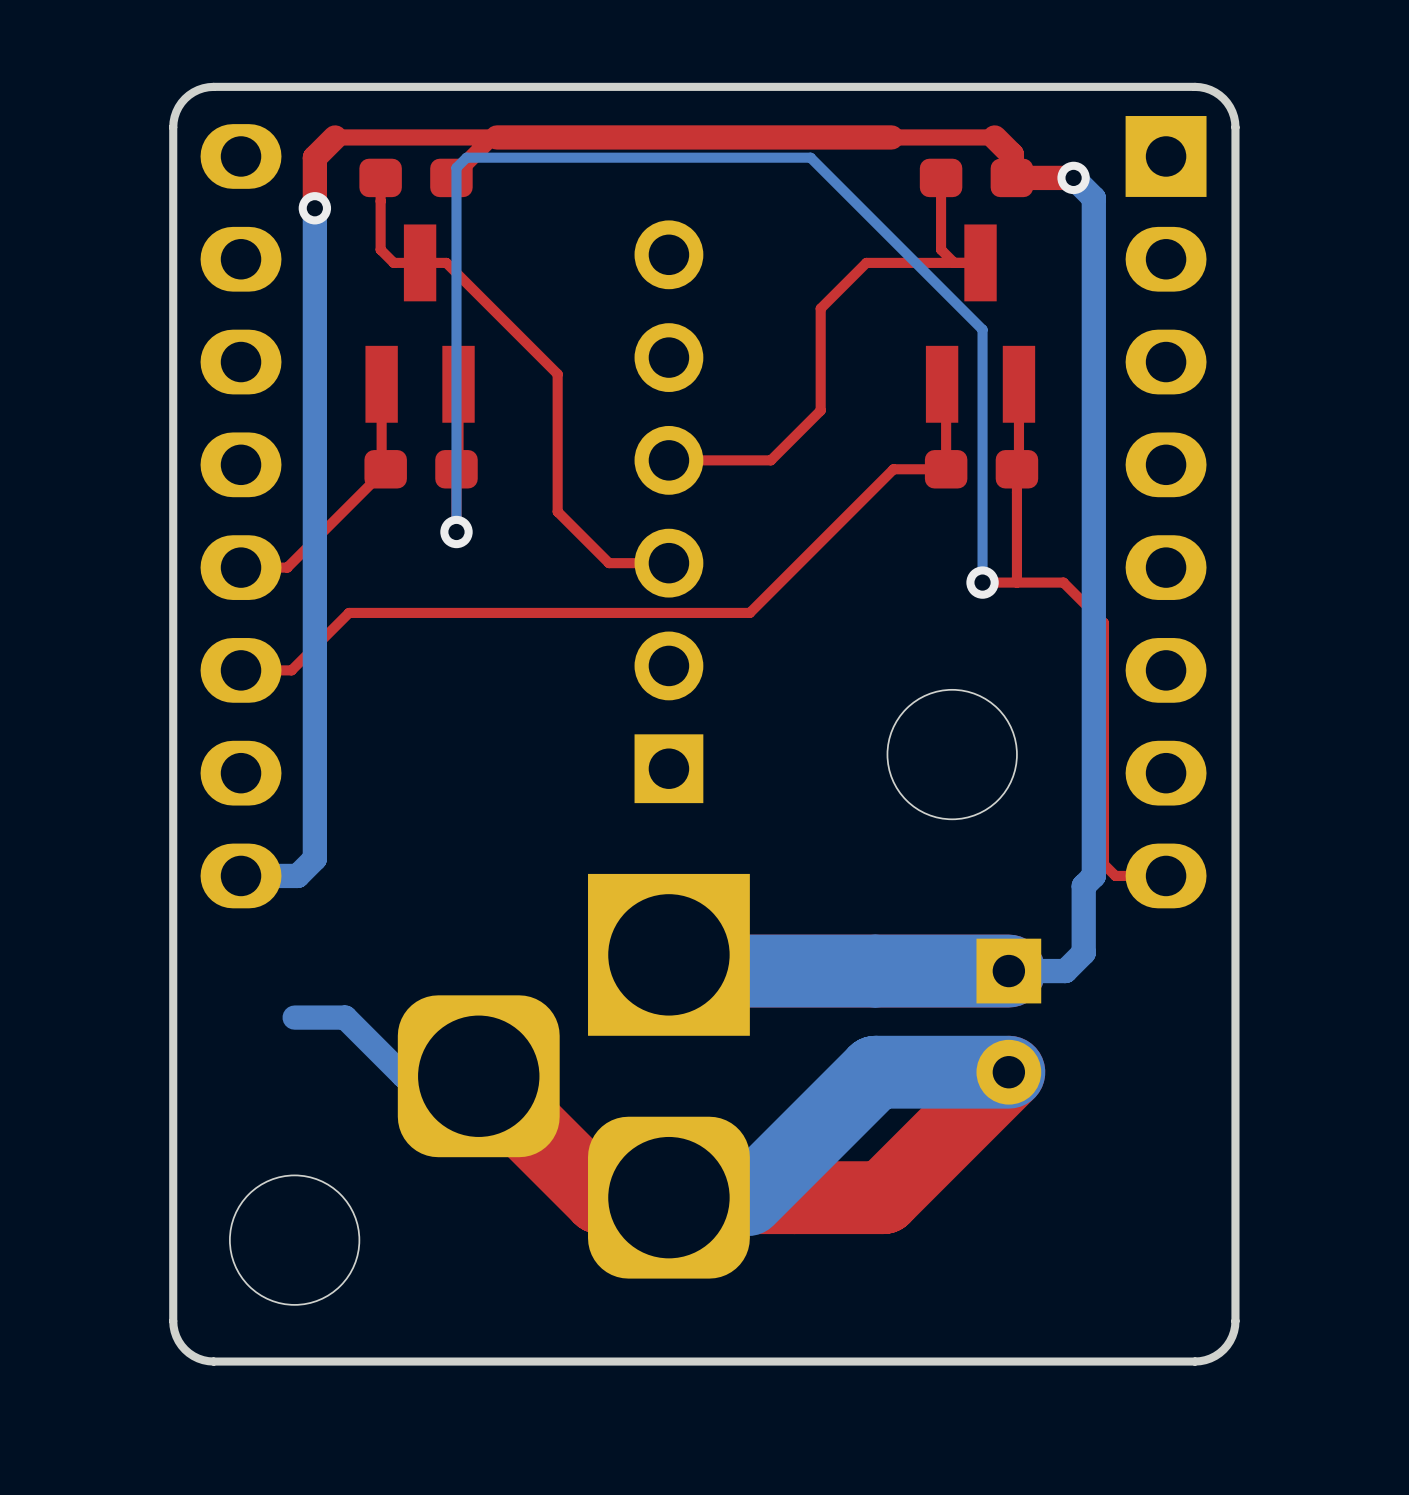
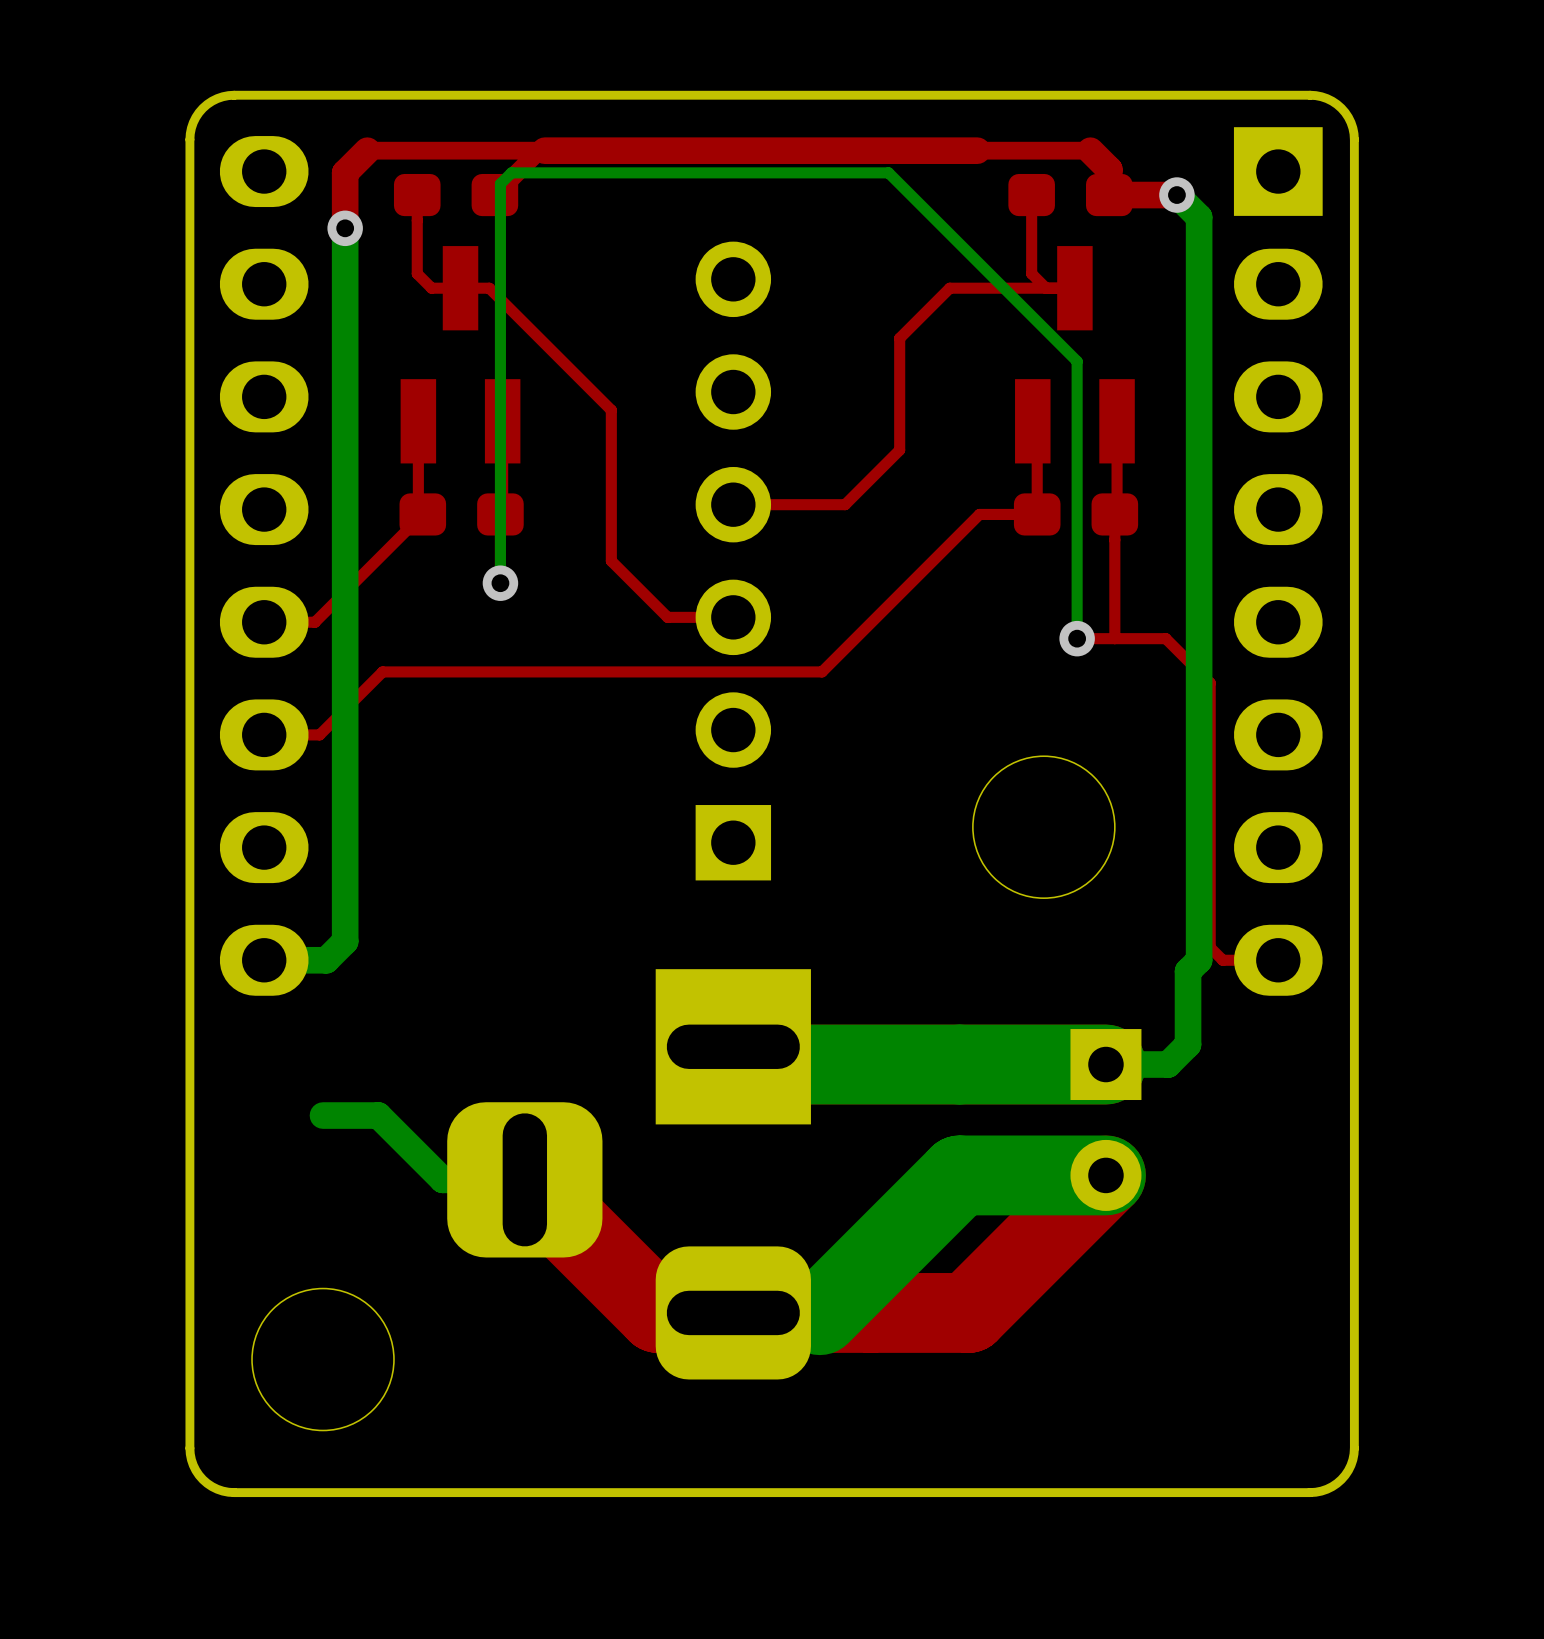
part footprint: [397, 873, 750, 1279] -> [447, 969, 811, 1380]

